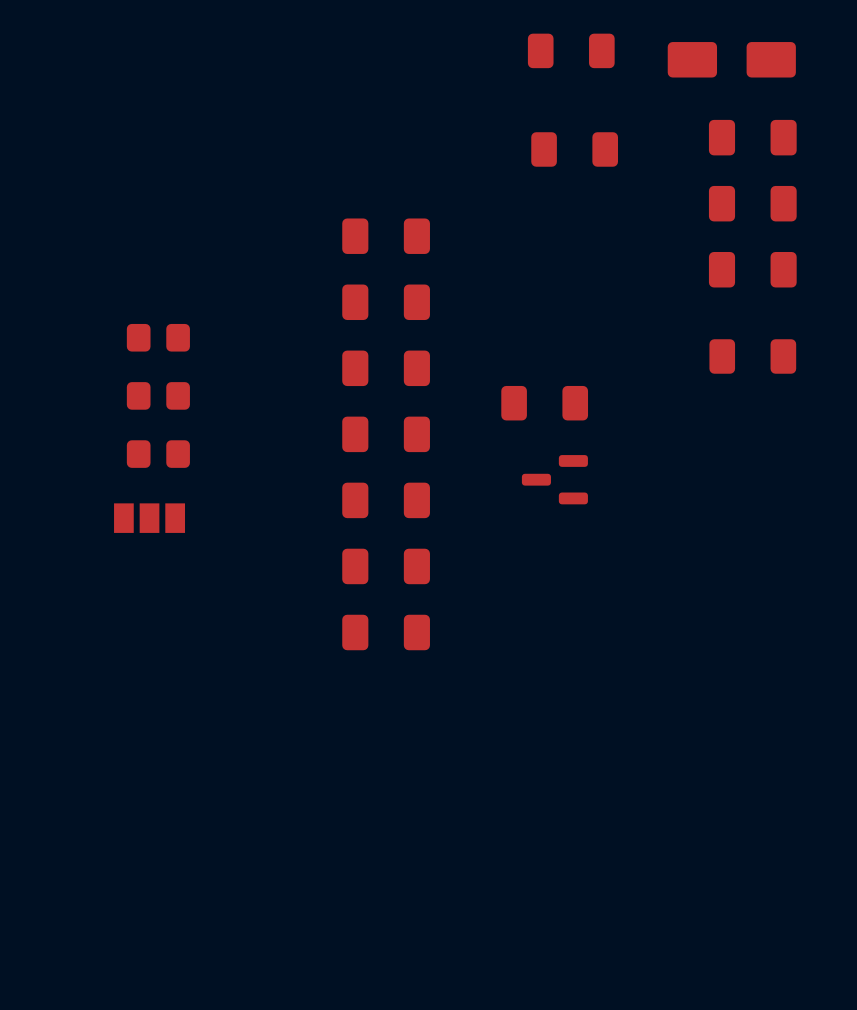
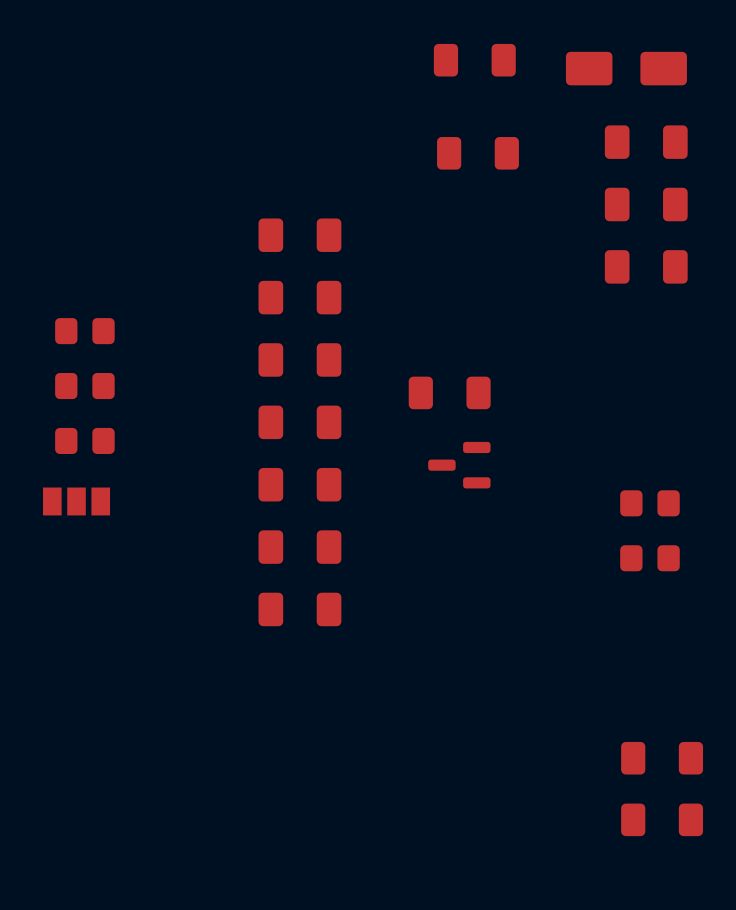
part: (752, 356) -> none
part: none -> (649, 503)
part: none -> (649, 558)
part: none -> (662, 758)
part: none -> (662, 819)

